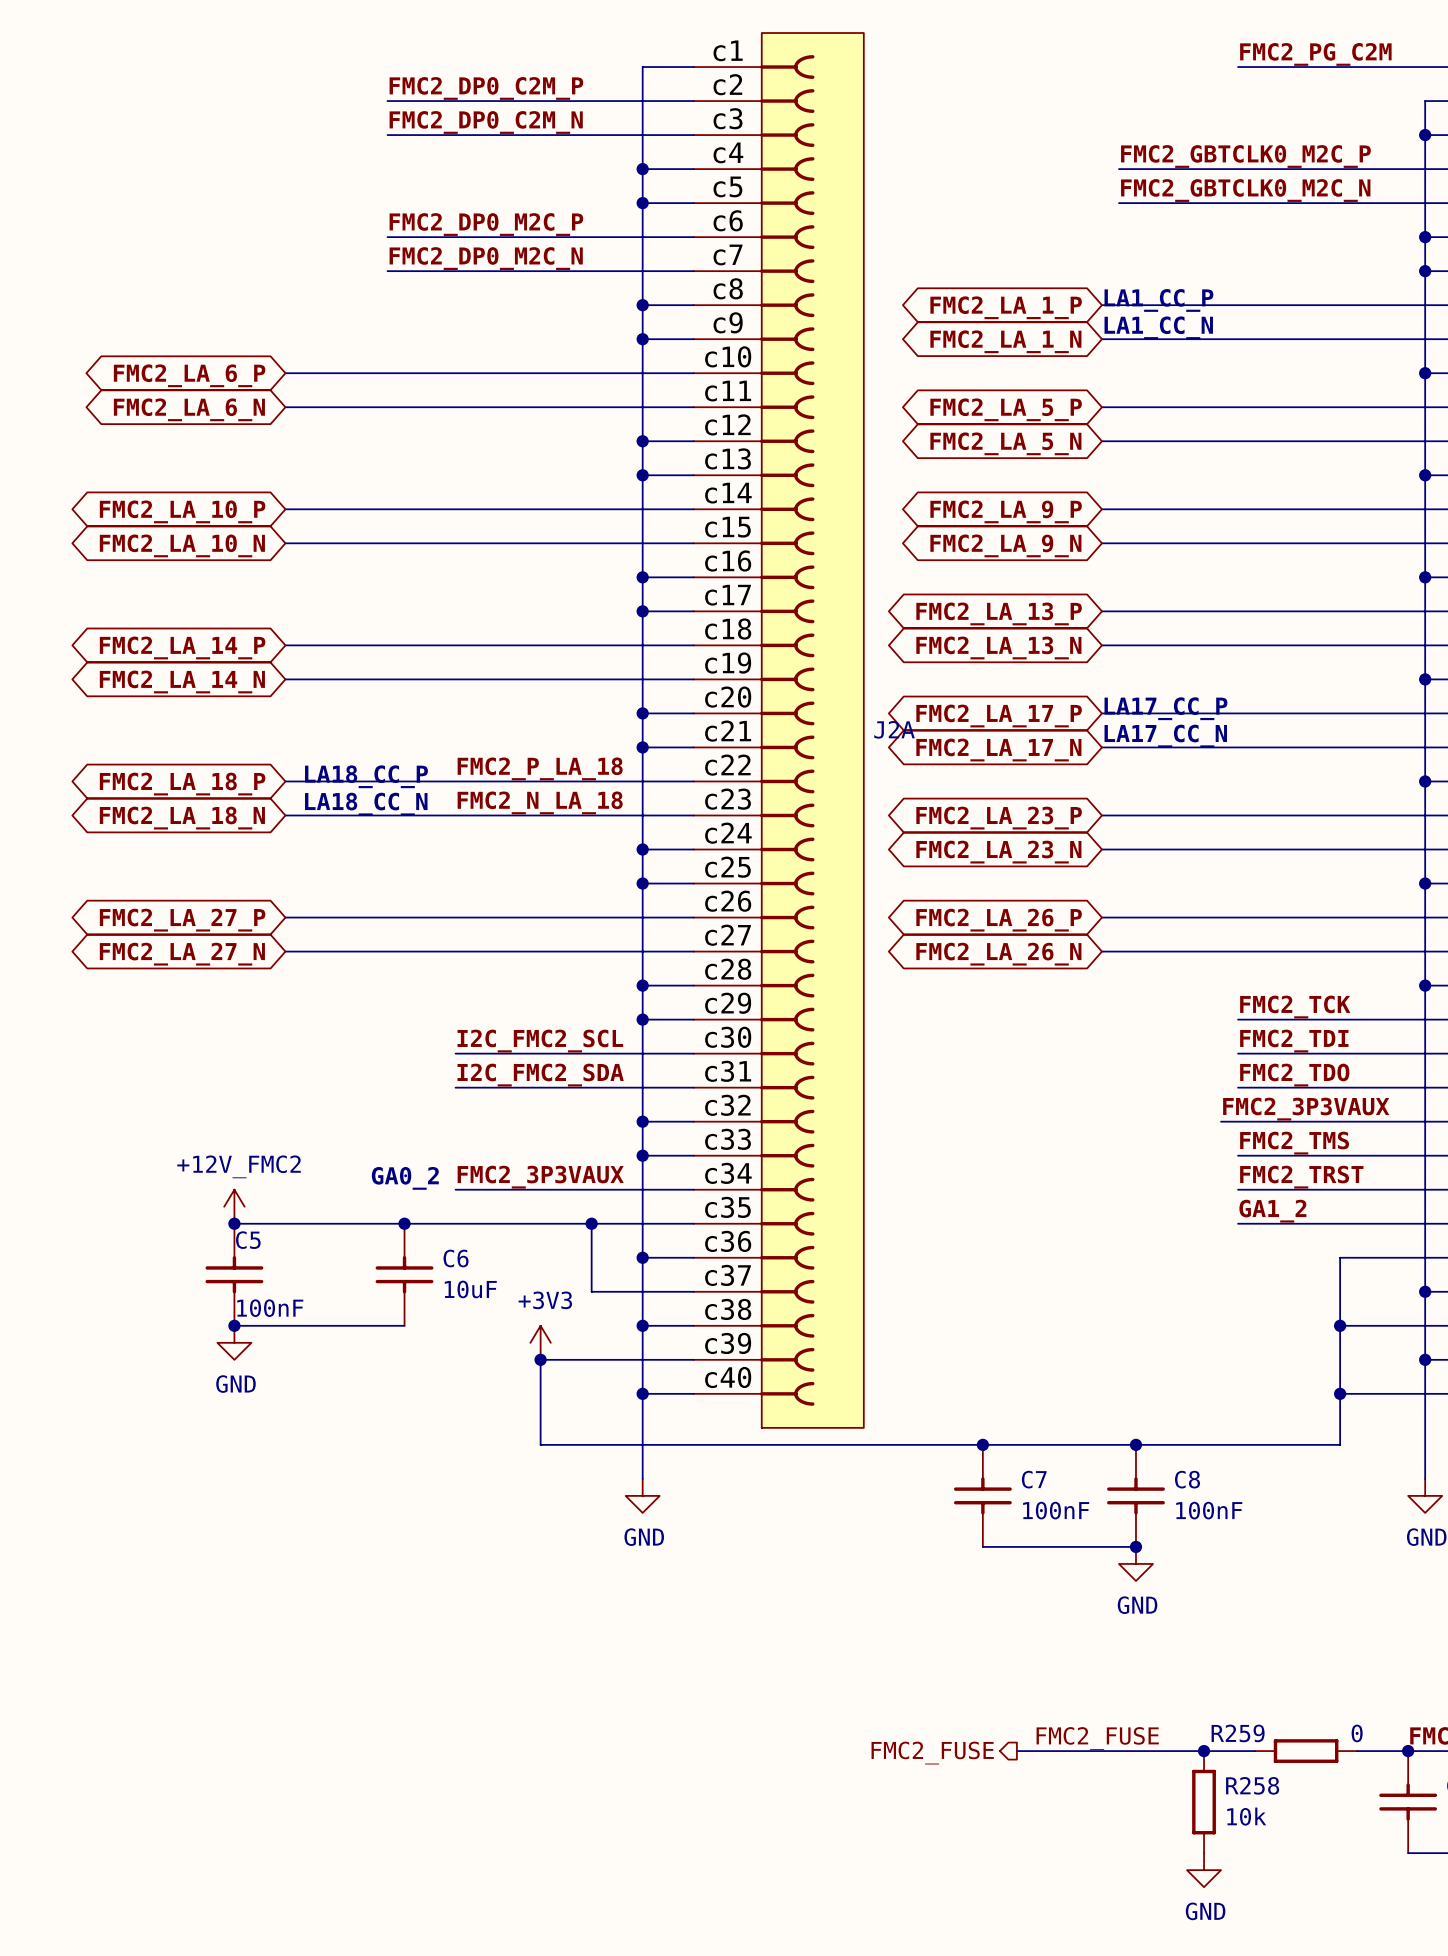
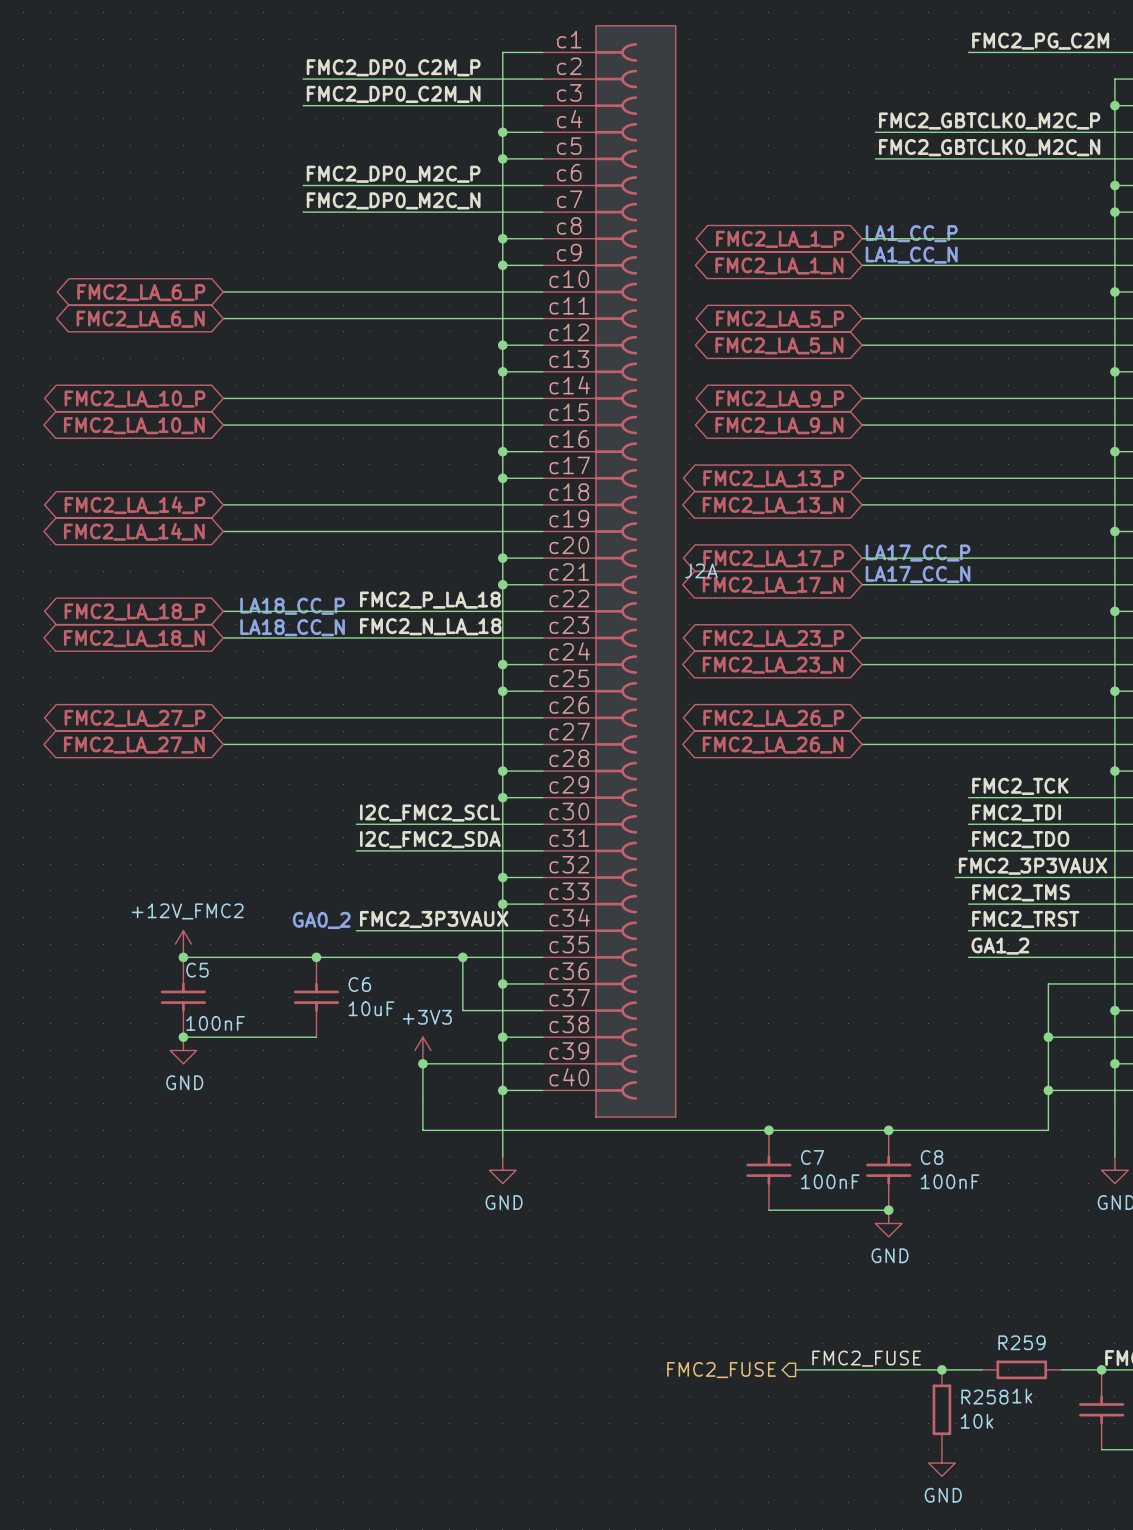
R259 name position: R259 (1238, 1733) -> R259 (1021, 1342)
R259 text: 0 (1357, 1733) -> 1k (1022, 1396)

